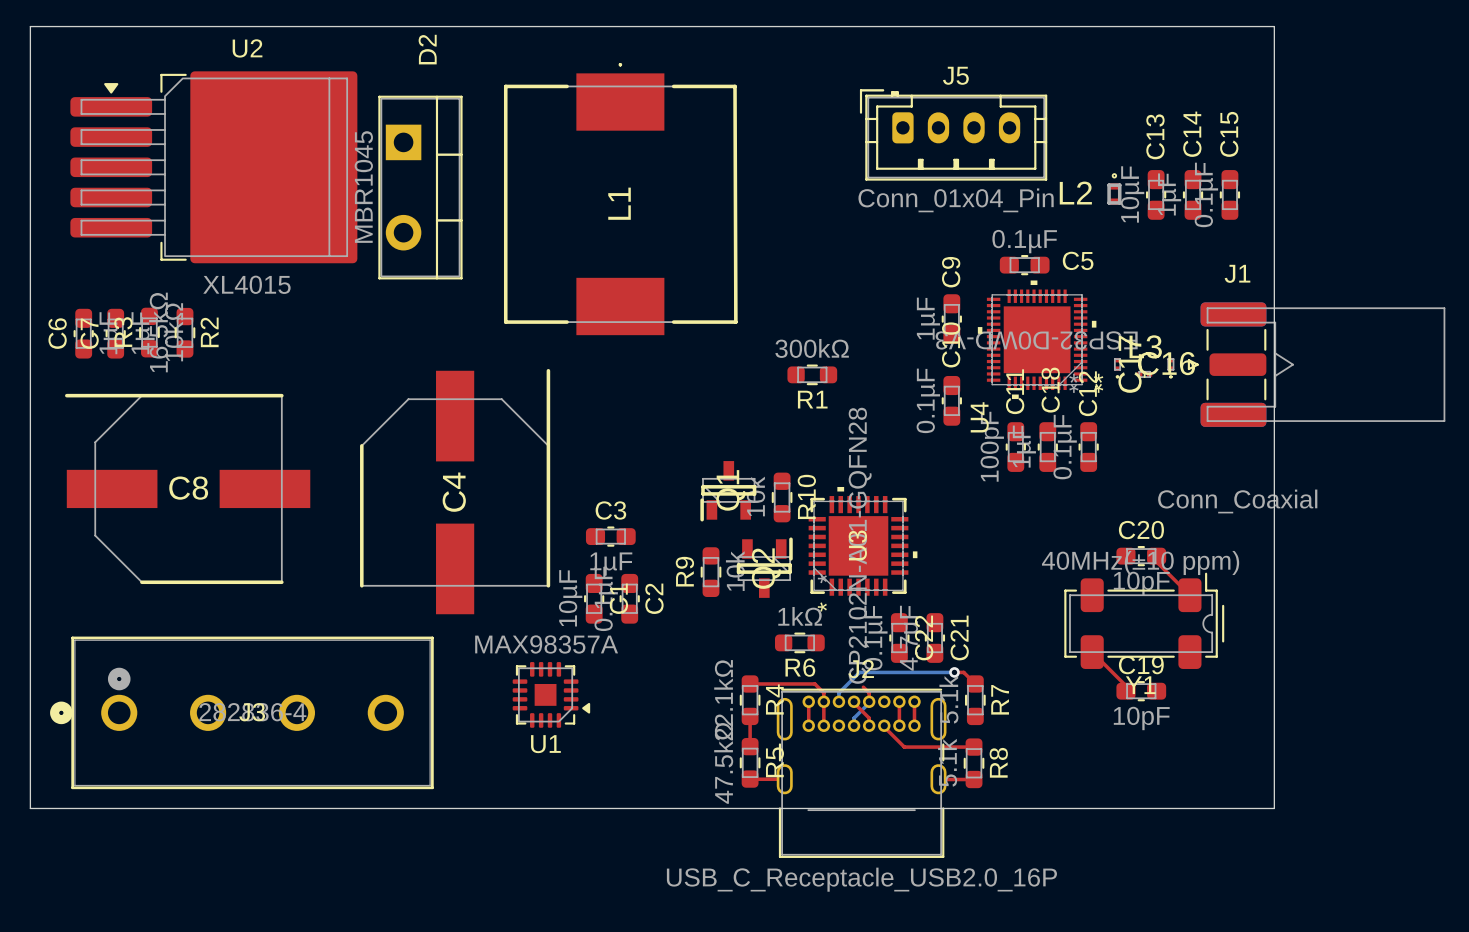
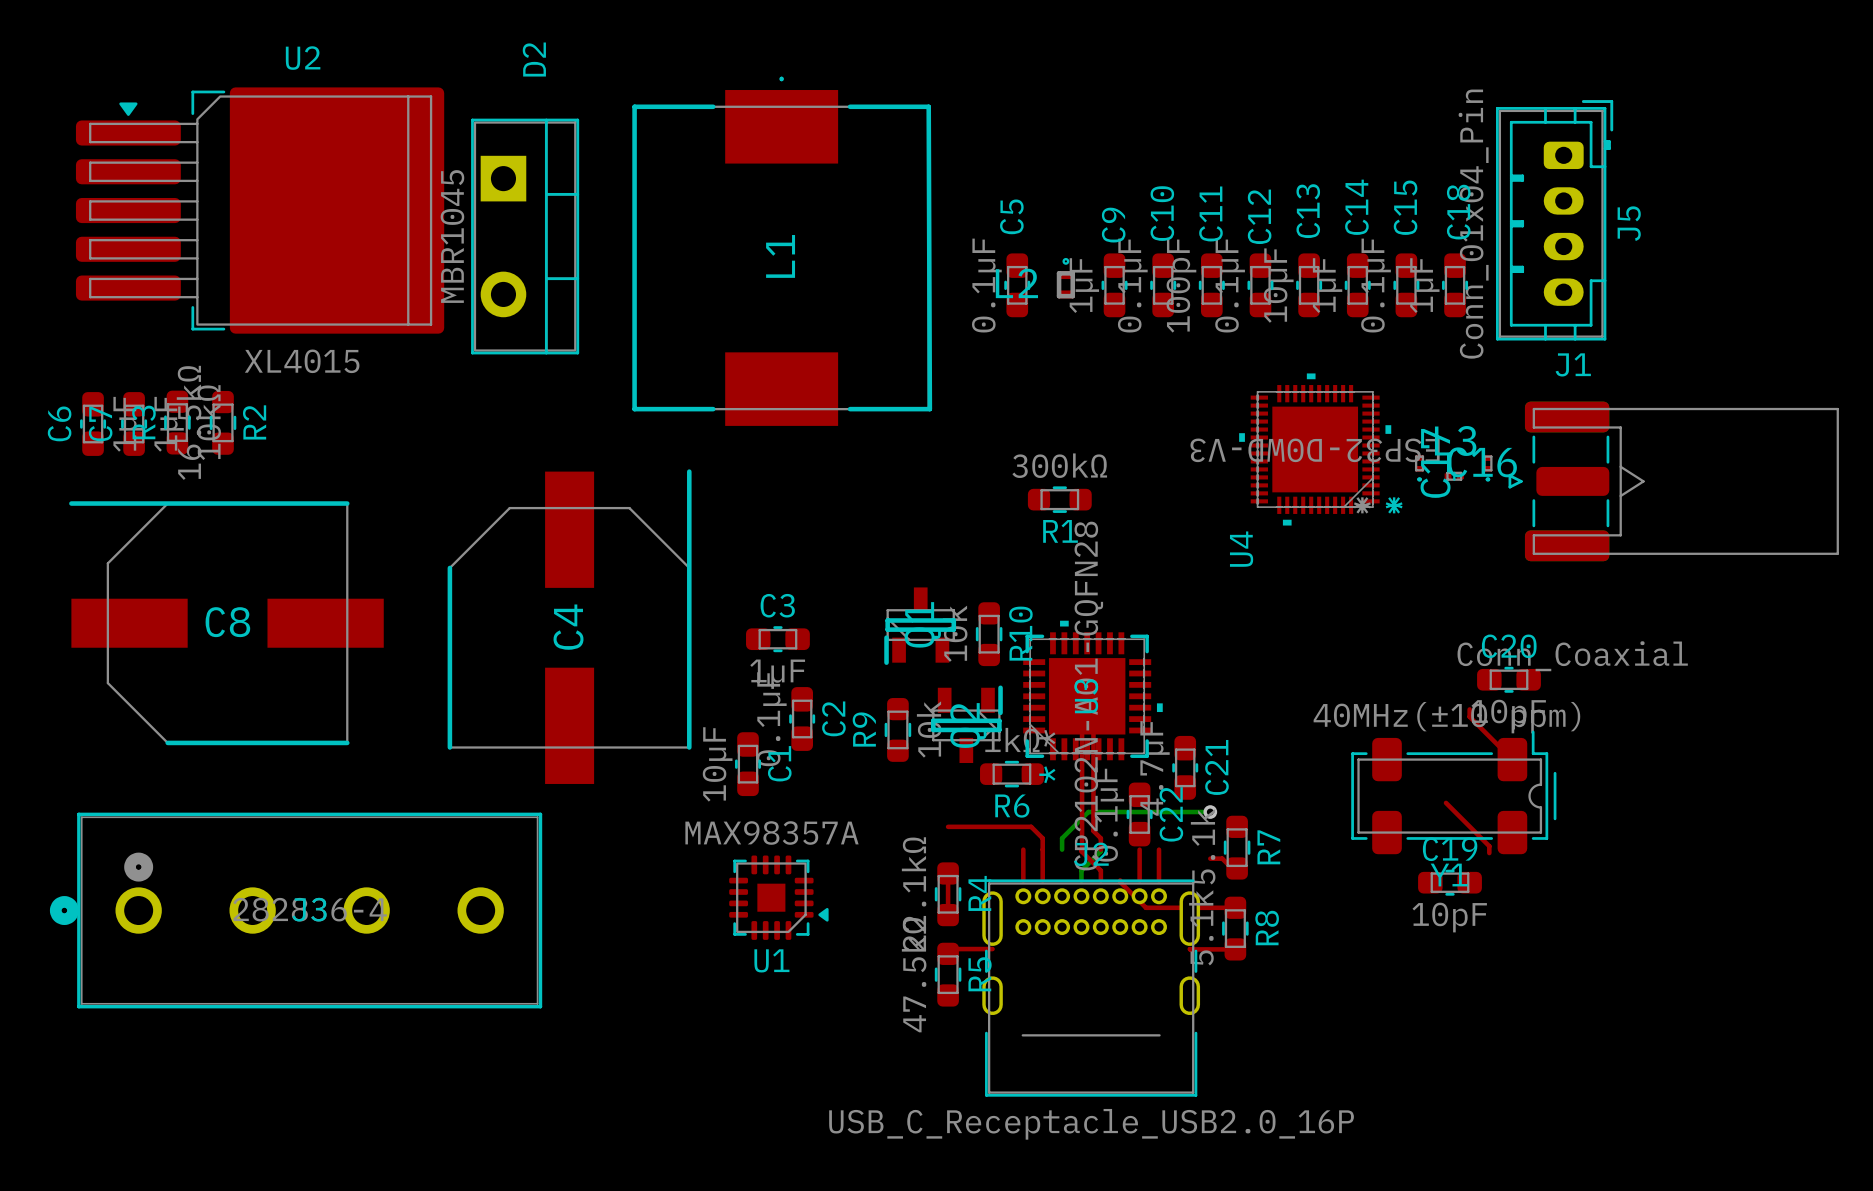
board edge: (30, 26) (1274, 26) (1274, 808) (30, 808) (30, 26) -> none
J5 rotation: 0° (953, 134) -> 90° clockwise (1554, 220)
J5 position: (953, 134) -> (1554, 220)
L2 position: (1114, 188) -> (1065, 278)
C13 position: (1156, 194) -> (1309, 285)
C14 position: (1193, 194) -> (1357, 285)
C15 position: (1229, 194) -> (1406, 285)
C5 value position: 0.1µF (1024, 241) -> 0.1µF (986, 285)
C5 name position: C5 (1078, 260) -> C5 (1011, 216)
C5 rotation: 0° (1024, 265) -> 90° clockwise (1017, 285)
C5 position: (1024, 265) -> (1017, 285)
C9 position: (951, 319) -> (1114, 285)
U4 position: (1037, 339) -> (1315, 449)
J1 position: (1316, 364) -> (1673, 481)
R1 position: (812, 374) -> (1059, 499)
C10 position: (951, 400) -> (1163, 285)
C11 position: (1015, 447) -> (1211, 285)
C18 position: (1047, 447) -> (1455, 285)
C12 position: (1088, 447) -> (1260, 285)
C3 position: (610, 536) -> (777, 639)
top track: none -> (1082, 698) (1081, 851) (1100, 870) (1100, 880)
top track: none -> (1093, 698) (1093, 830) (1100, 838) (1100, 849)
C20 position: (1141, 556) -> (1509, 679)
C2 position: (629, 598) -> (802, 718)
C21 position: (934, 638) -> (1185, 767)
R6 position: (799, 642) -> (1011, 774)
top track: (1092, 652) (1125, 685) (1125, 691) -> (1446, 802) (1489, 846) (1489, 853)
bottom track: (954, 672) (859, 672) (838, 692) (838, 701) -> (1210, 812) (1088, 812) (1062, 838) (1062, 849)
via position: (954, 672) -> (1210, 812)
top track: (750, 683) (814, 683) (823, 692) (823, 725) -> (948, 826) (1031, 826) (1042, 838) (1042, 880)
top track: (863, 687) (869, 692) (869, 701) -> none
U1 position: (551, 694) -> (778, 897)
R7 position: (975, 700) -> (1237, 847)
top track: (808, 701) (808, 725) -> (1023, 849) (1023, 880)
top track: (854, 701) (869, 718) (869, 725) -> none
bottom track: (869, 701) (854, 718) (854, 725) -> (1100, 849) (1081, 870) (1081, 880)
top track: (899, 701) (899, 725) -> (1139, 849) (1139, 880)
top track: (914, 701) (914, 725) -> (1159, 849) (1159, 880)
top track: (750, 716) (750, 746) -> (948, 868) (948, 907)
top track: (884, 725) (904, 747) (974, 747) -> (1120, 880) (1145, 907) (1235, 907)
R8 position: (974, 763) -> (1235, 928)
top track: (750, 779) (784, 779) -> (948, 949) (992, 949)
top track: (938, 779) (974, 779) -> (1189, 949) (1235, 949)

